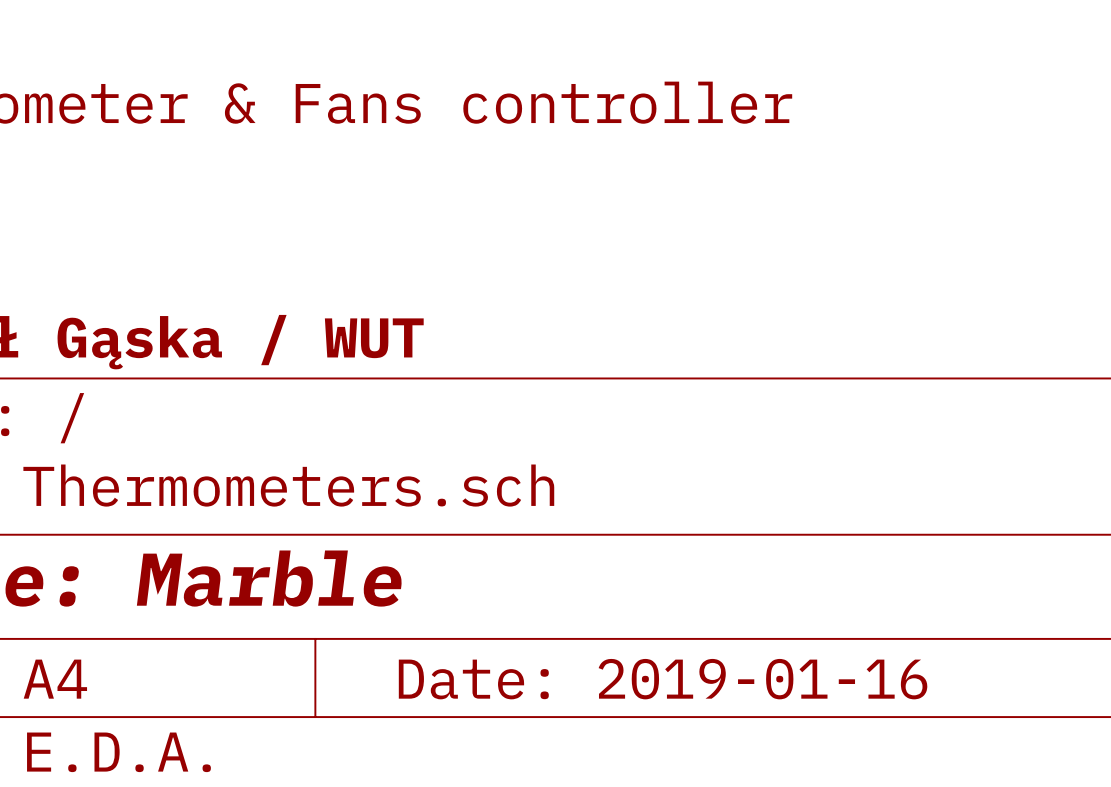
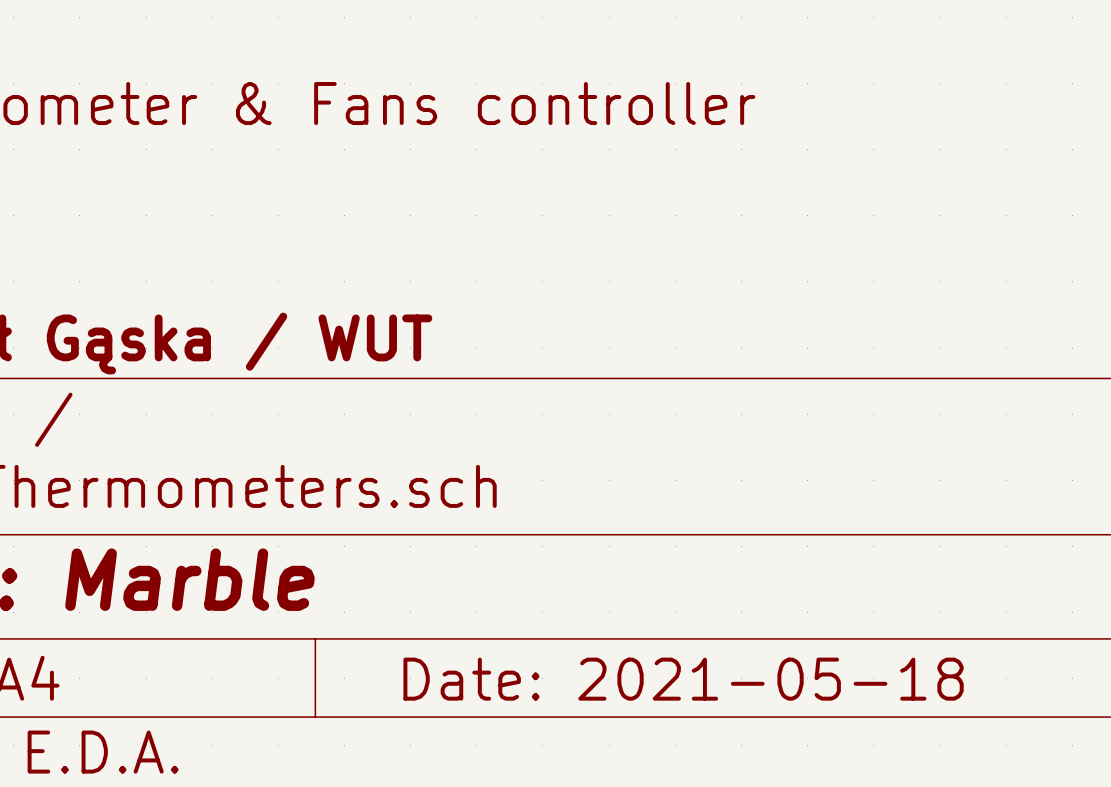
title block: Date: 2019-01-16 (663, 679) -> Date: 2021-05-18 (683, 679)

